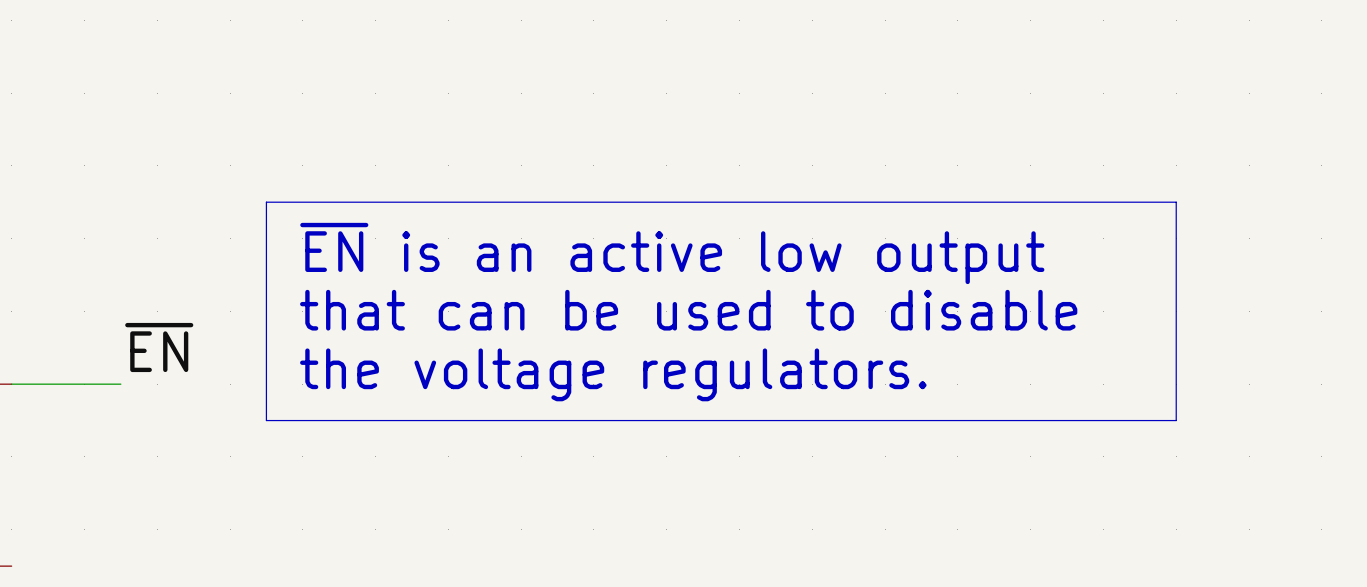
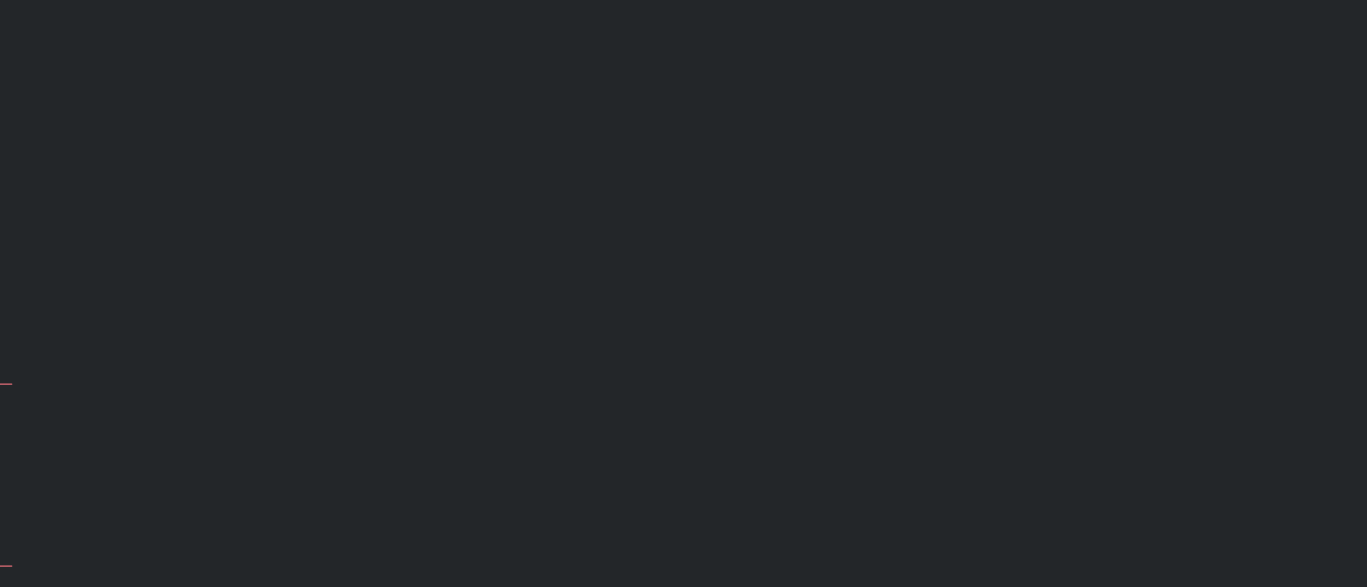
line: (266, 202) (1176, 202) (1176, 420) (266, 420) (266, 202) -> none
text: ~{EN} is an active low output (672, 253) -> none
text: that can be used to disable (688, 310) -> none
label: ~{EN} (159, 347) -> none
text: the voltage regulators. (613, 374) -> none
wire: (11, 384) (120, 384) -> none

